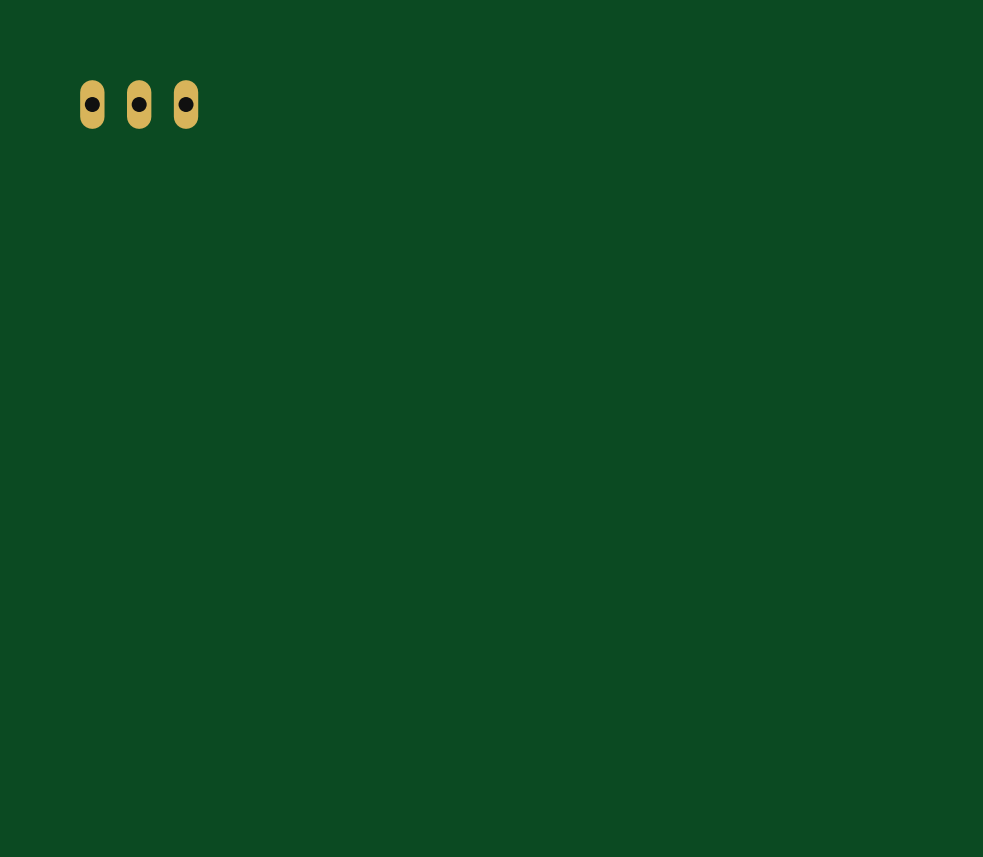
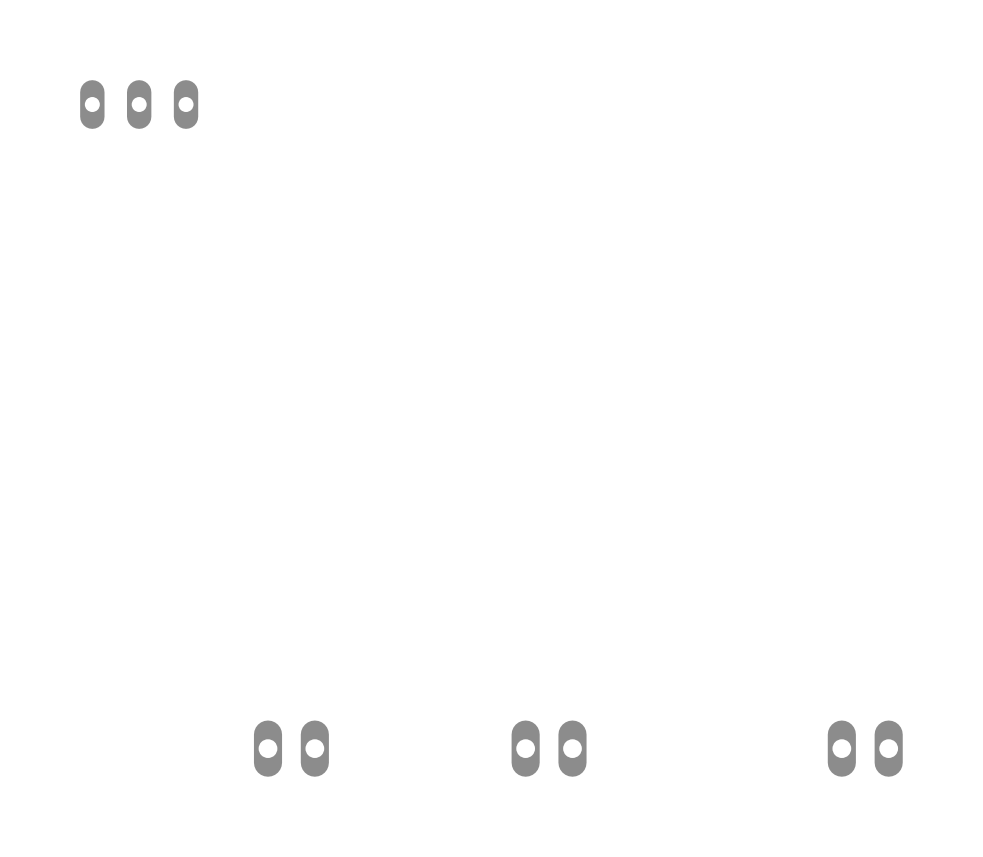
part: none -> (291, 748)
part: none -> (549, 748)
part: none -> (865, 748)

